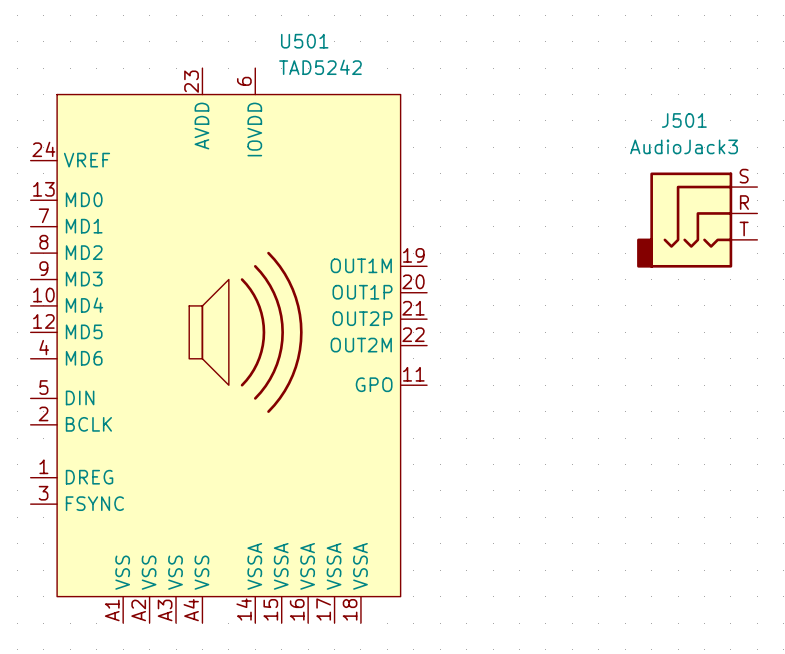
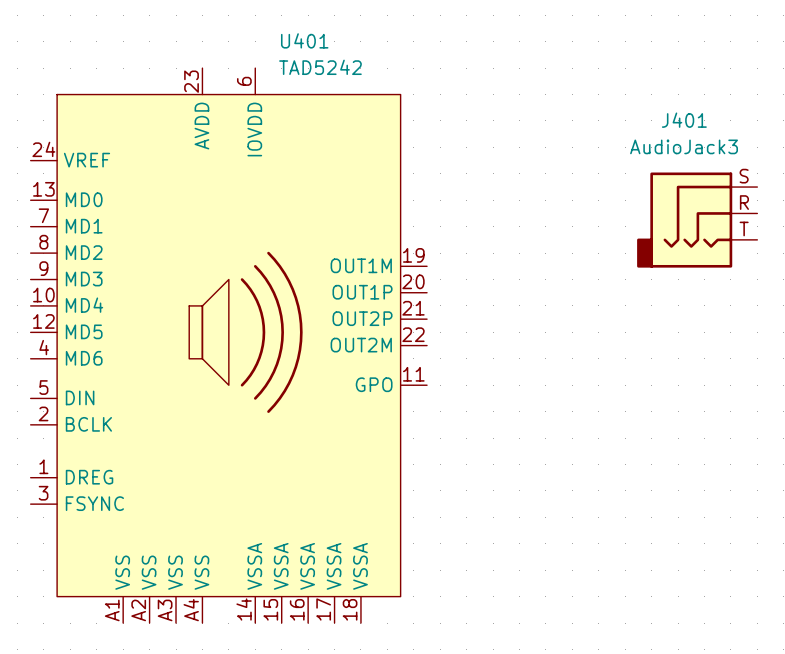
U501 name: U501 (304, 41) -> U401 (304, 40)
J501 name: J501 (684, 120) -> J401 (684, 120)

